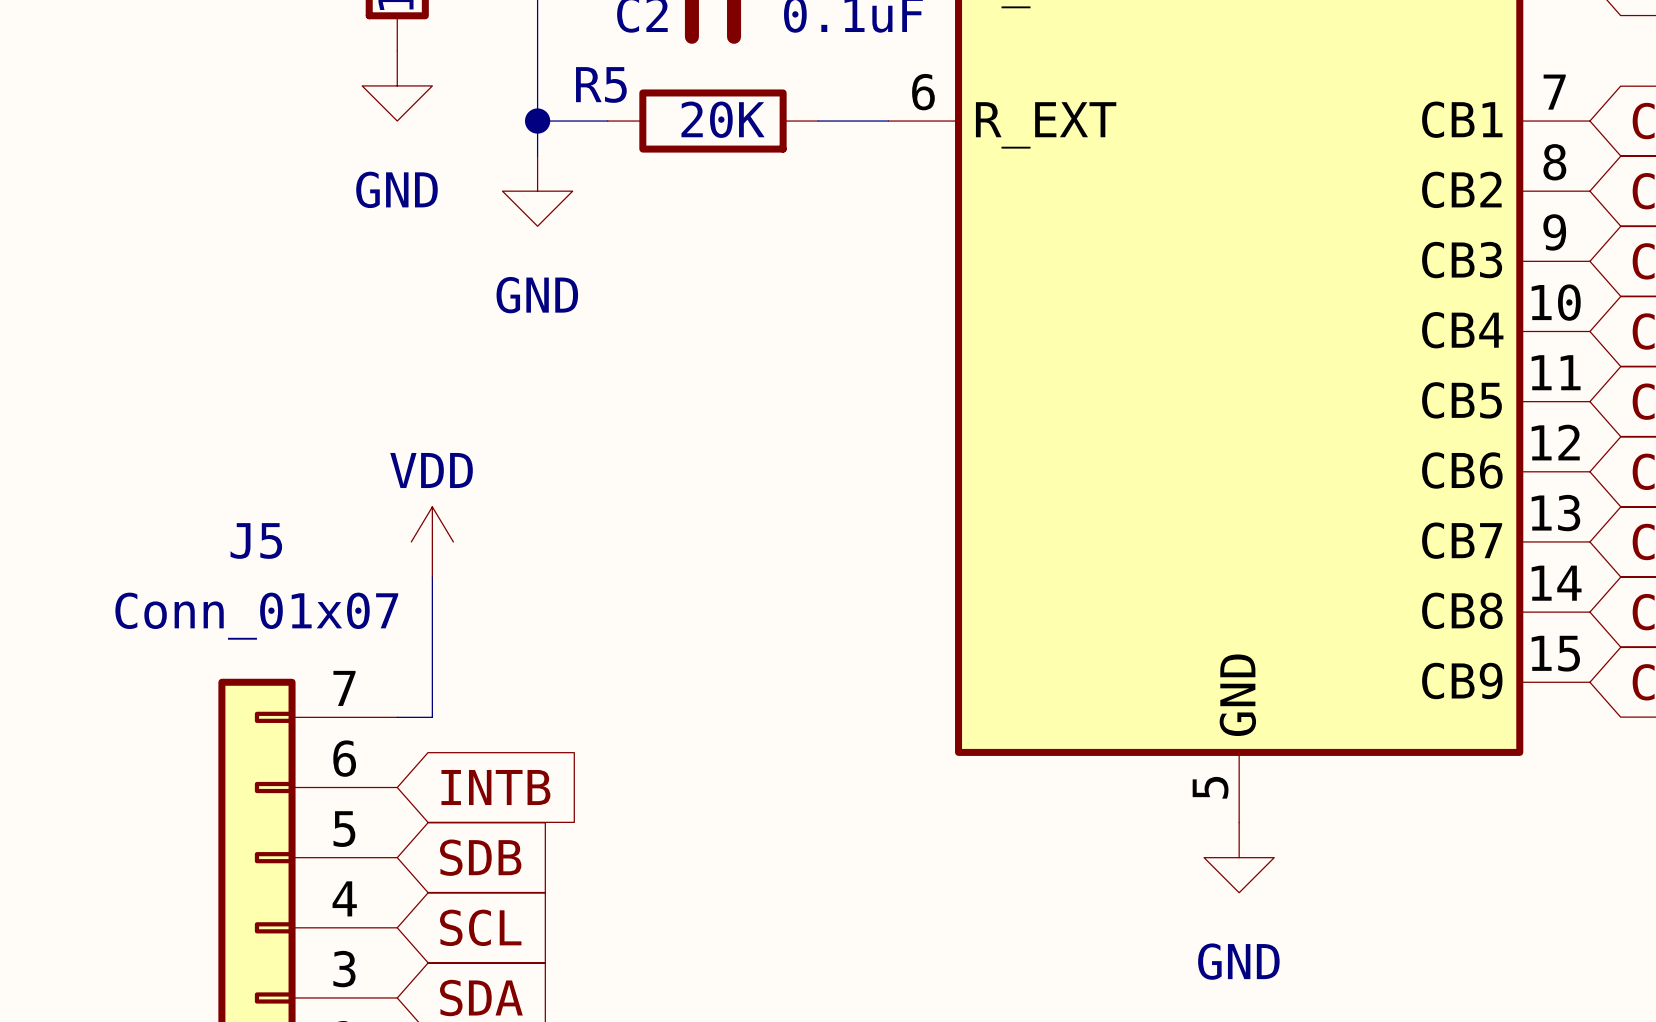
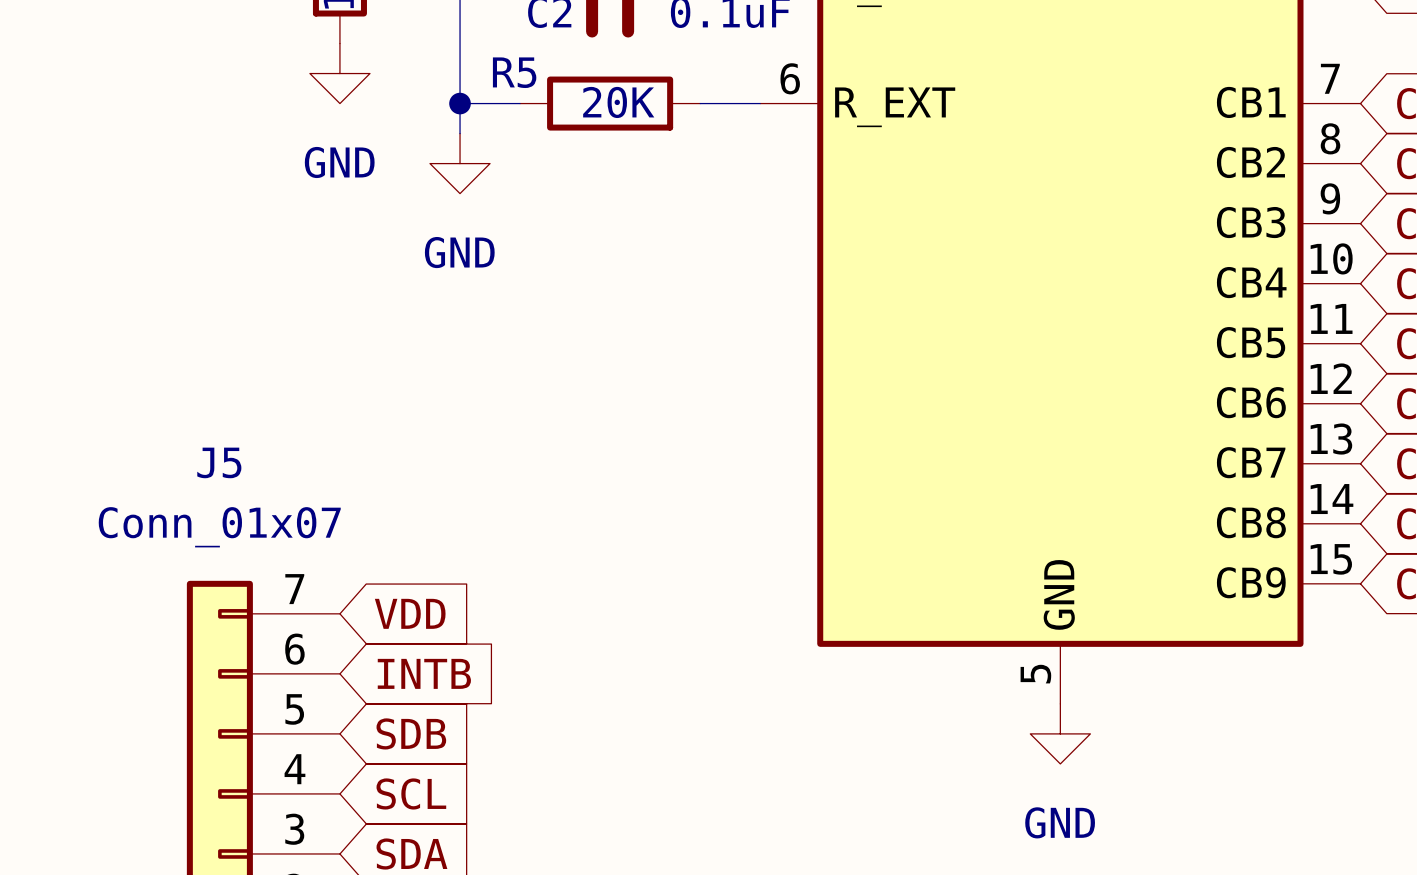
power symbol: VDD (432, 541) -> none
wire: (432, 577) (432, 717) (397, 717) -> none
global label: none -> VDD (410, 613)

